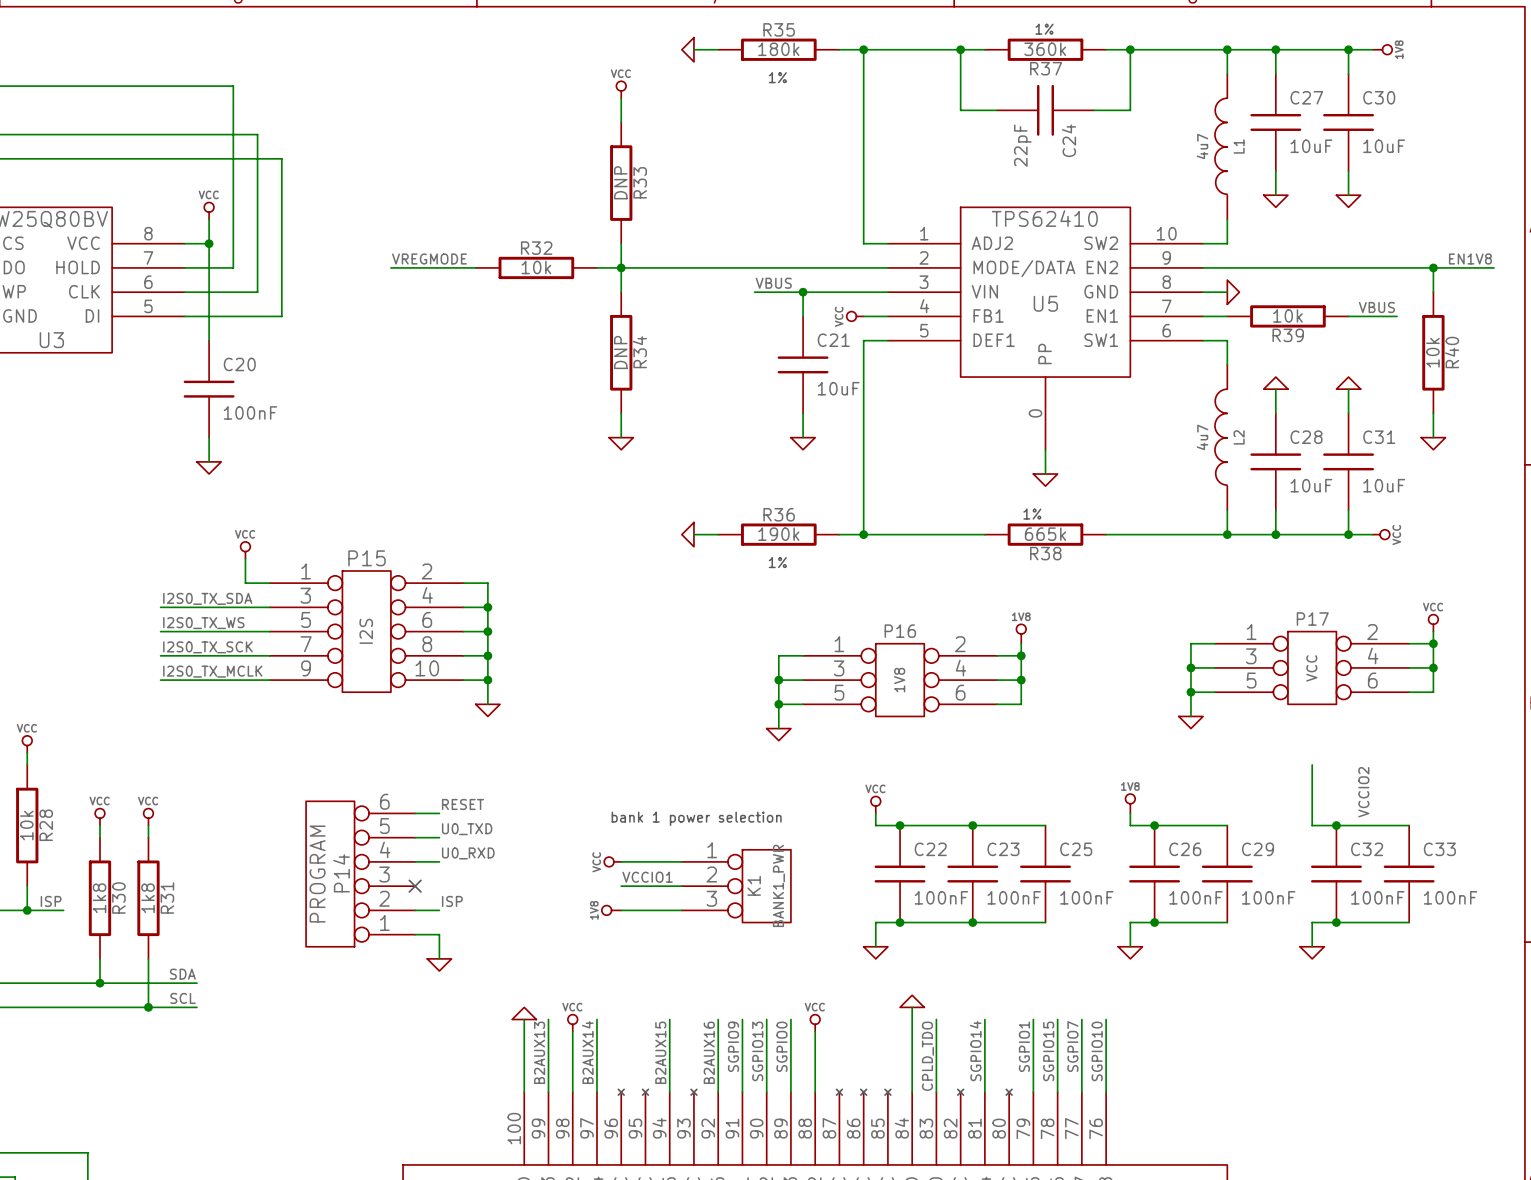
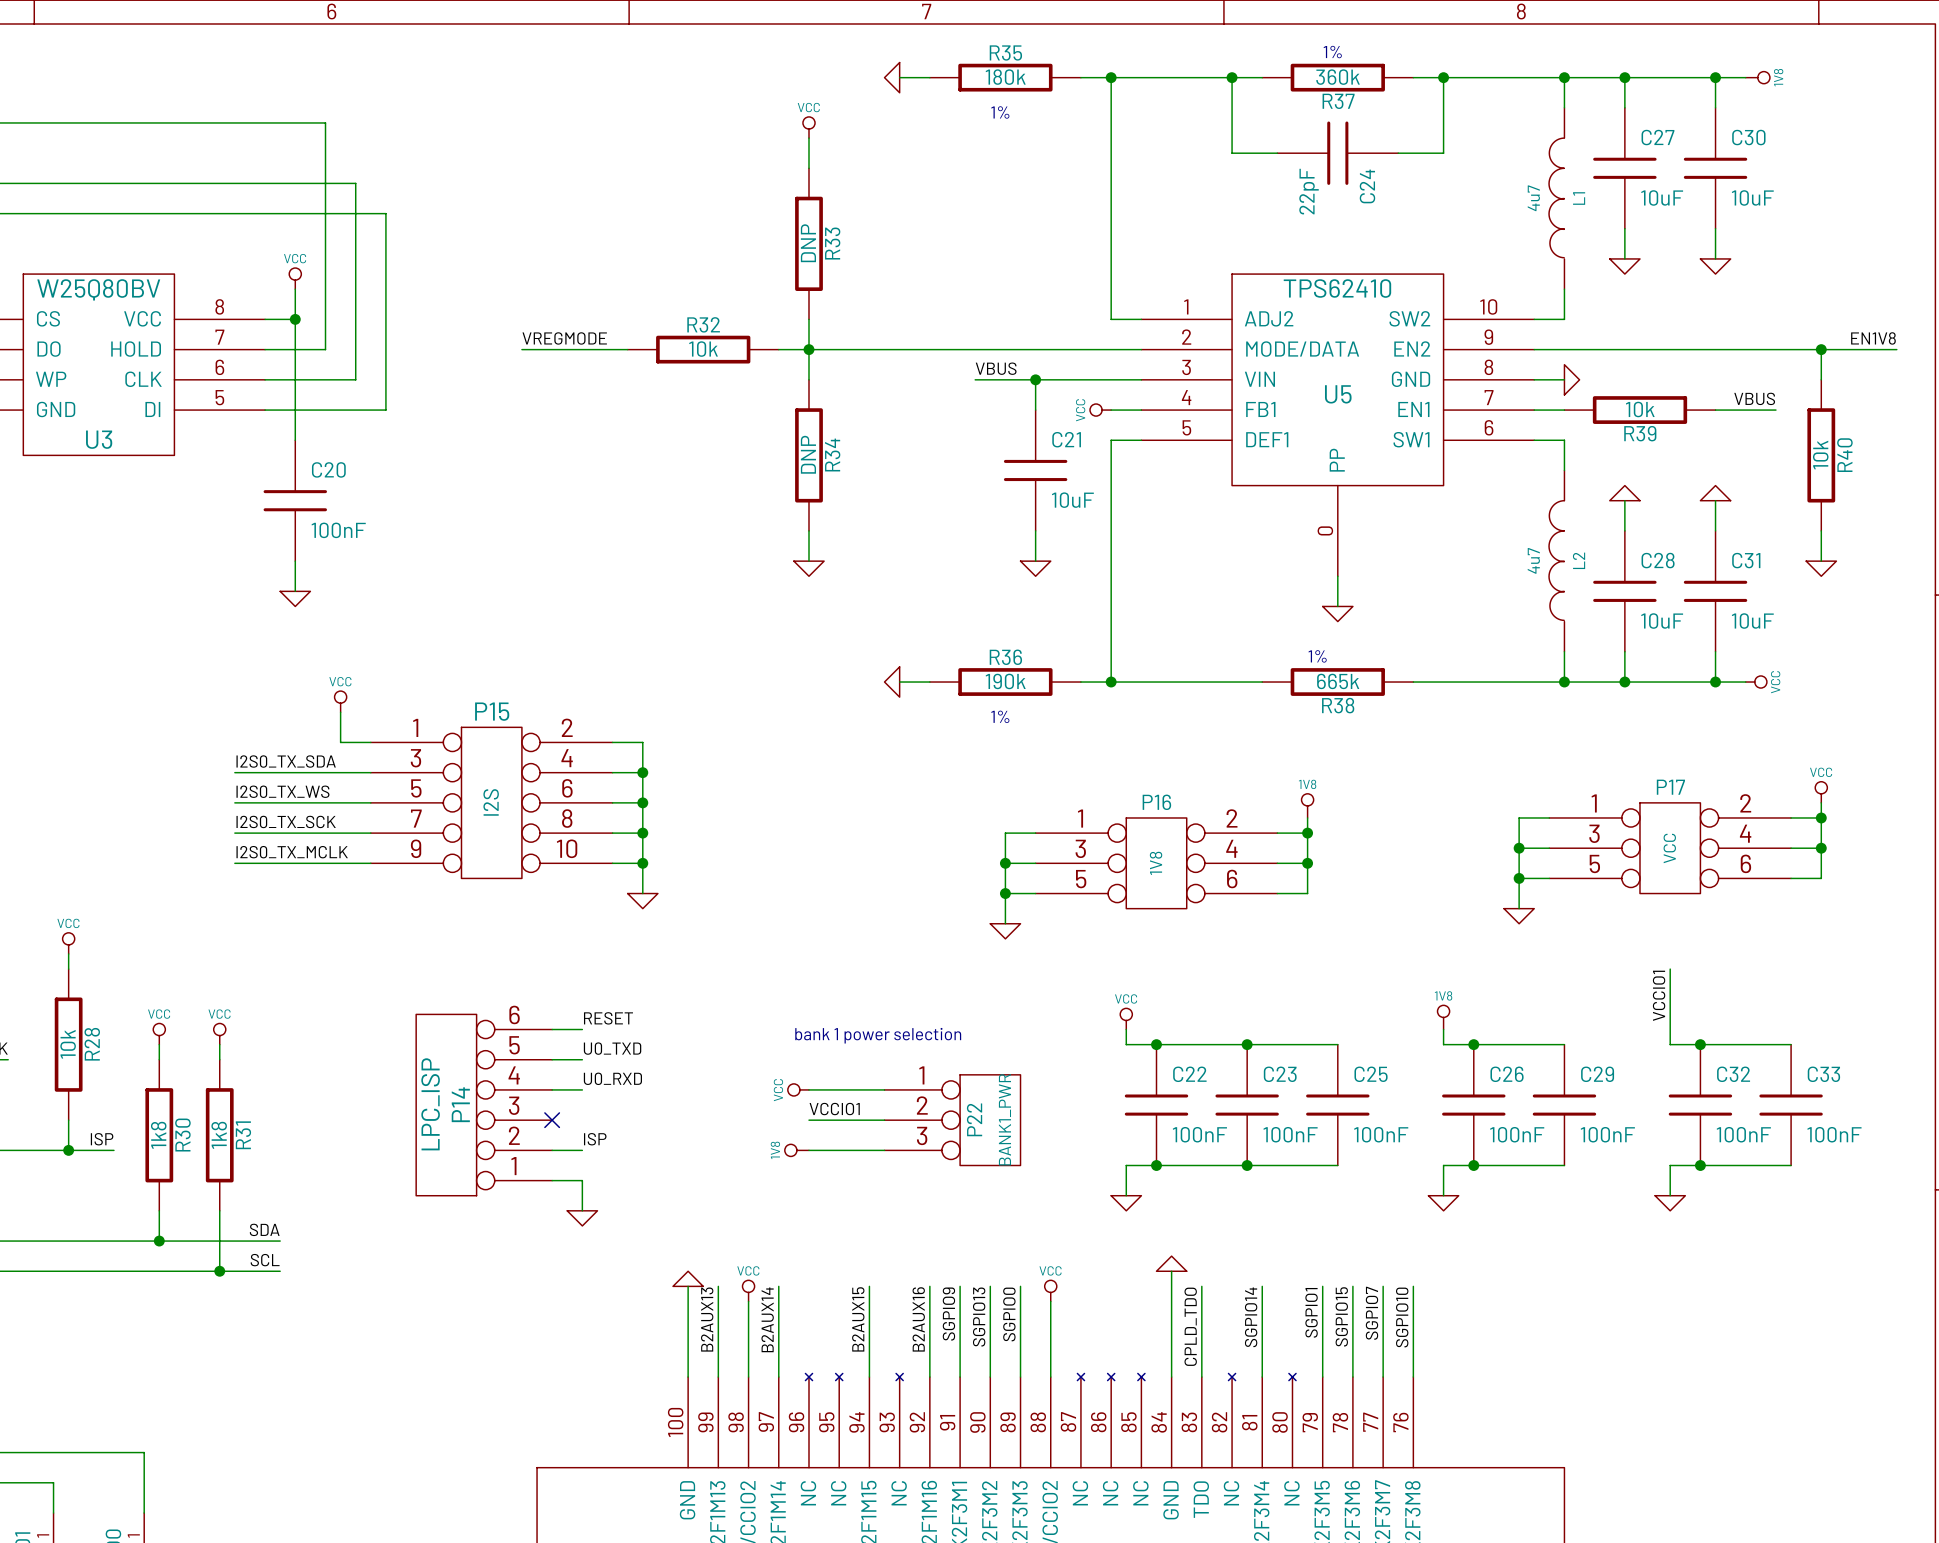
label: none -> VCCIO1 (1659, 995)
label: VCCIO2 (1363, 792) -> none
P14 value: PROGRAM (317, 874) -> LPC_ISP (430, 1104)
K1 name: K1 (754, 885) -> P22 (974, 1119)

